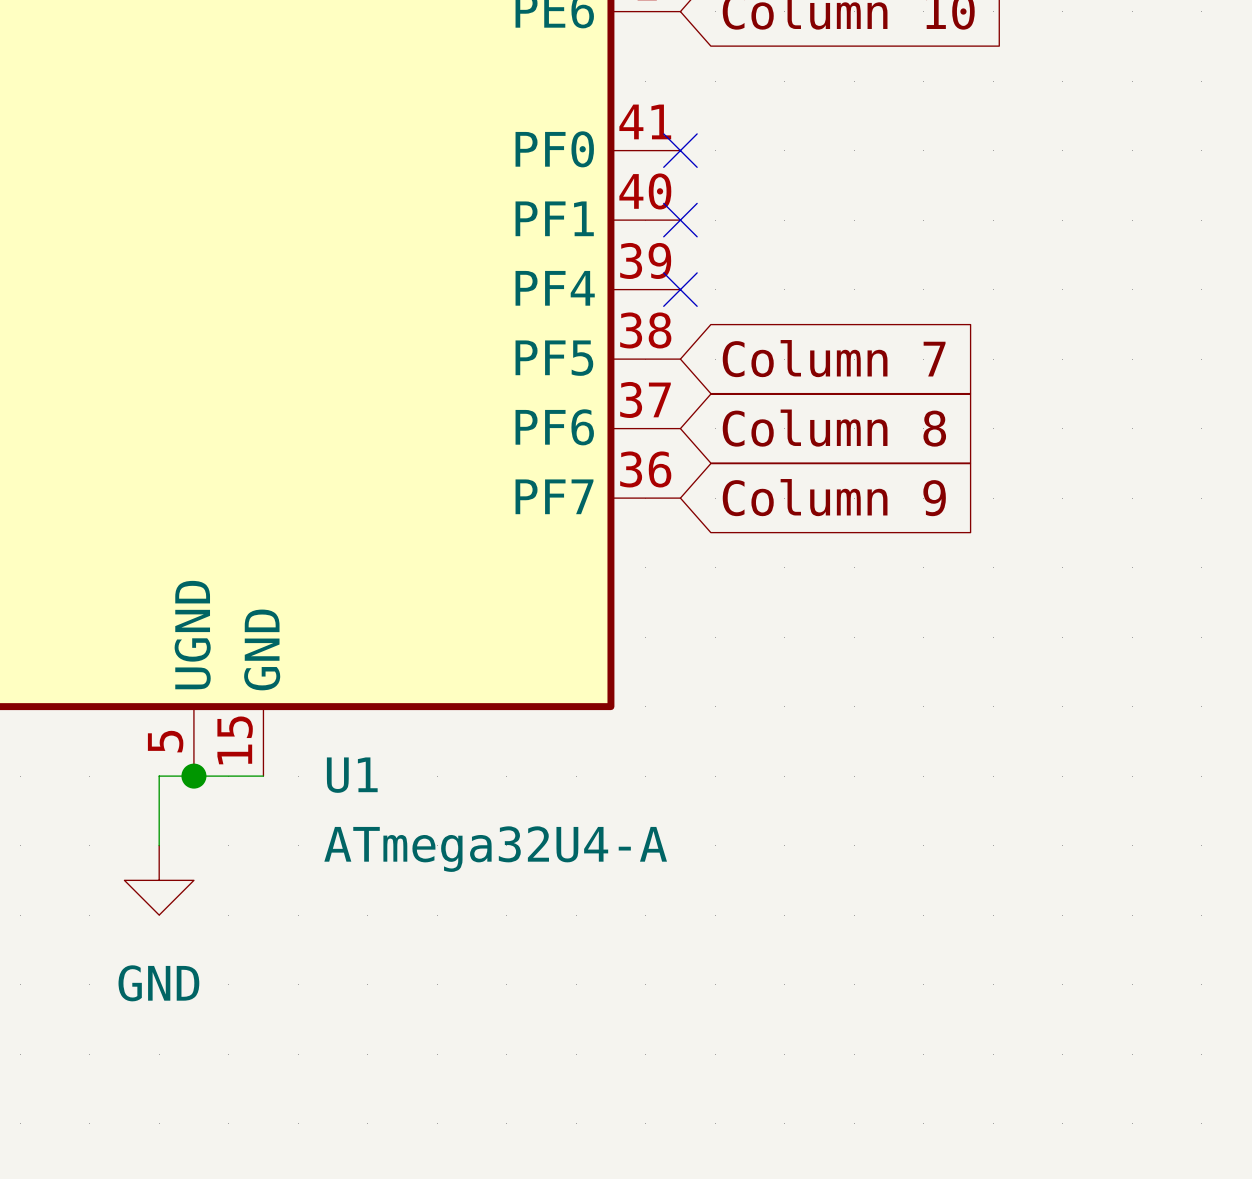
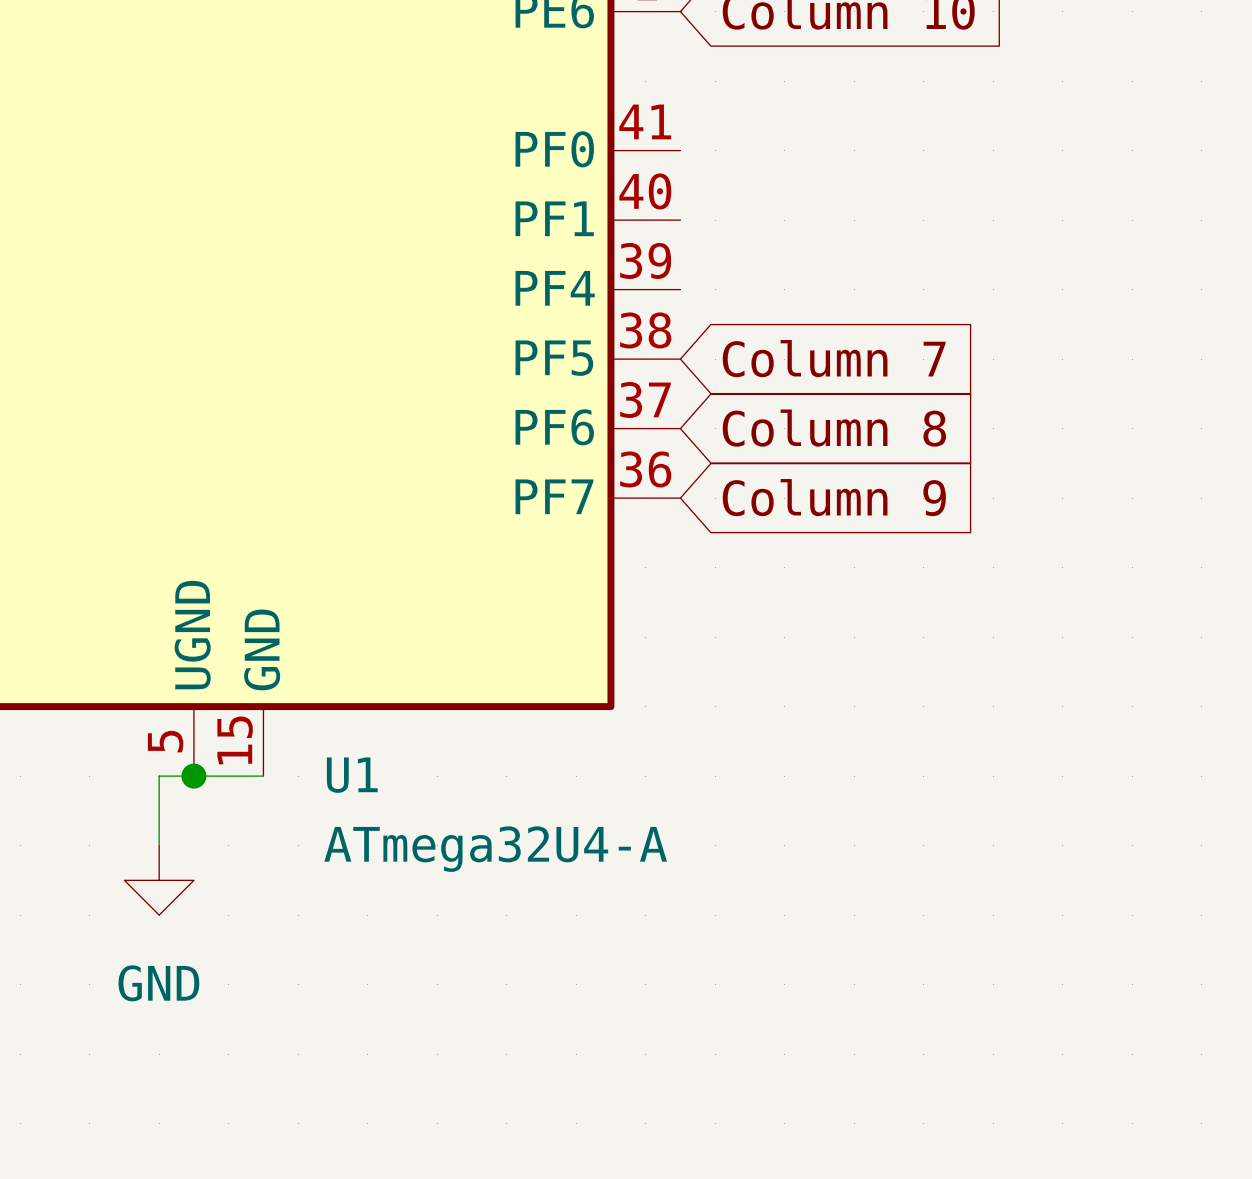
no-connect mark: (680, 150) -> none
no-connect mark: (680, 220) -> none
no-connect mark: (680, 289) -> none

